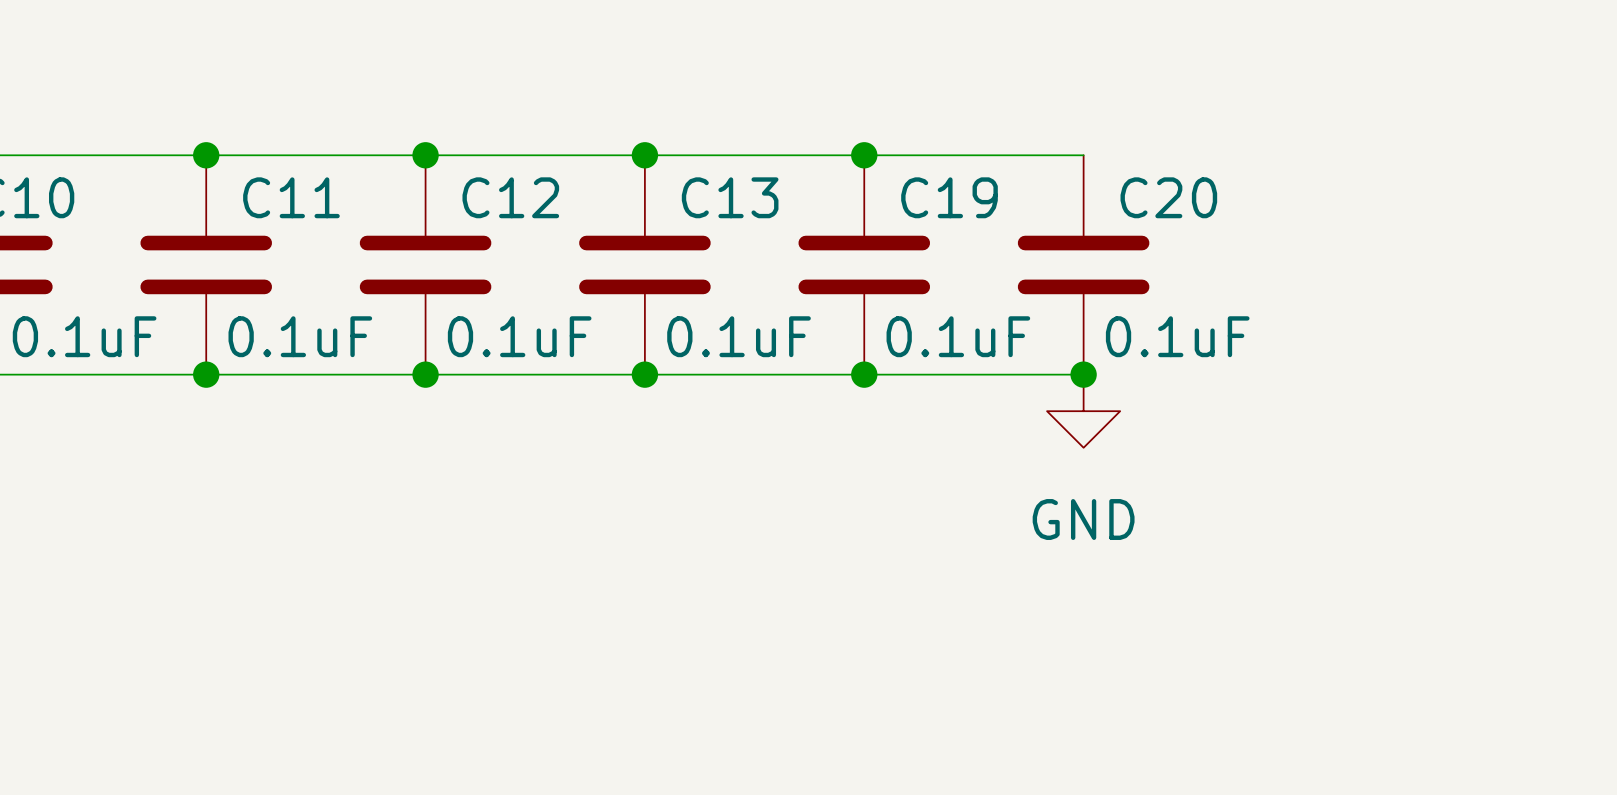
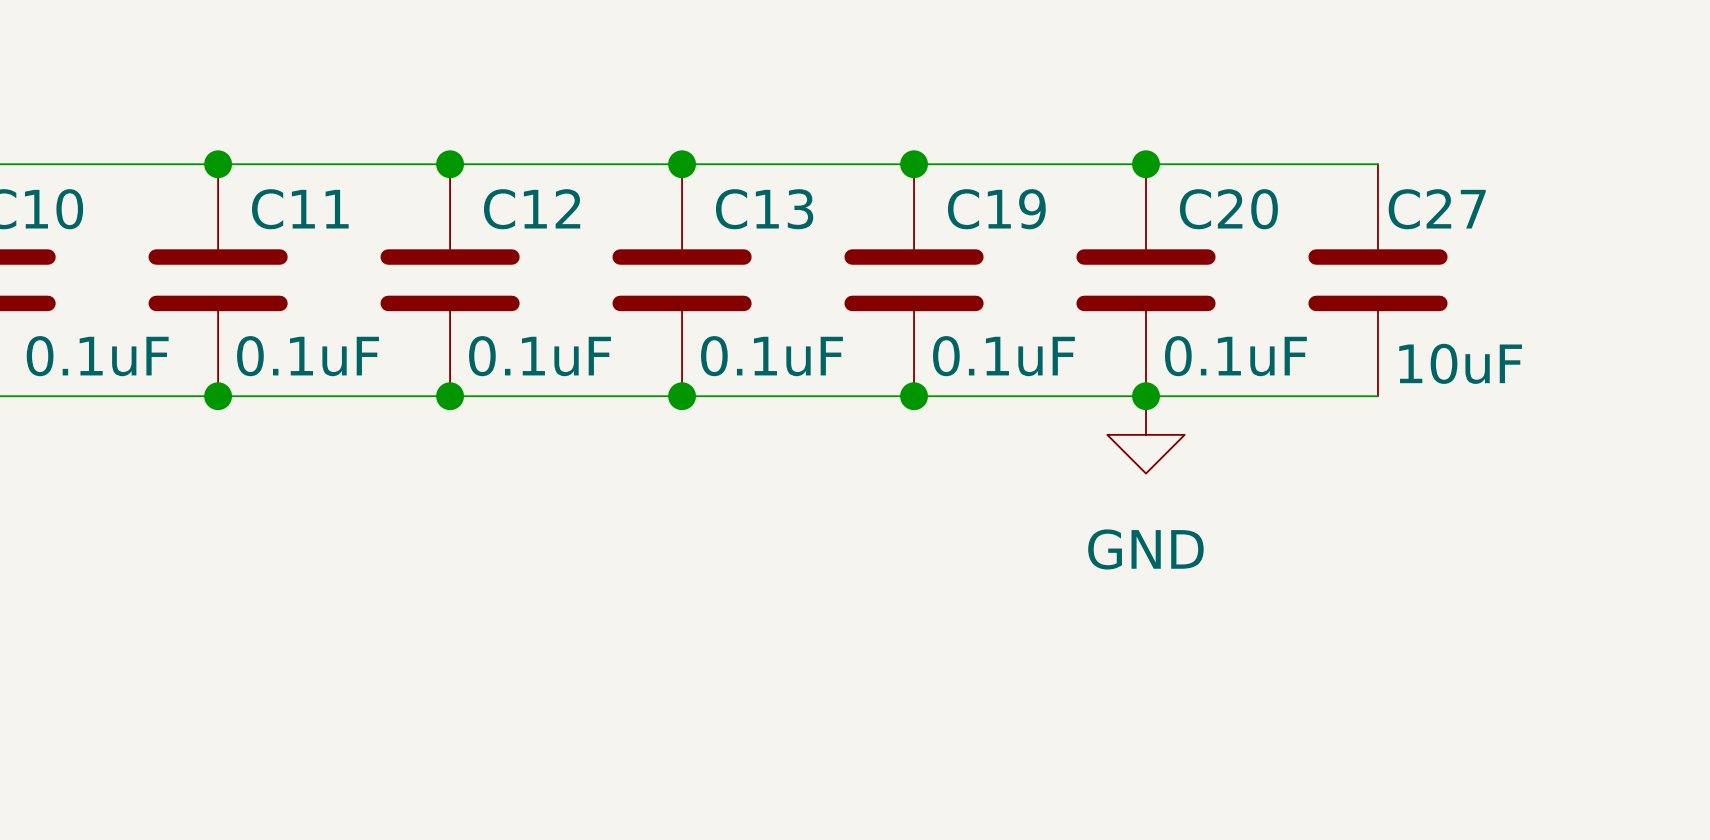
wire: none -> (1146, 164) (1377, 164)
junction: none -> (1146, 164)
C27: none -> 10uF (1377, 280)
wire: none -> (1146, 396) (1377, 396)

